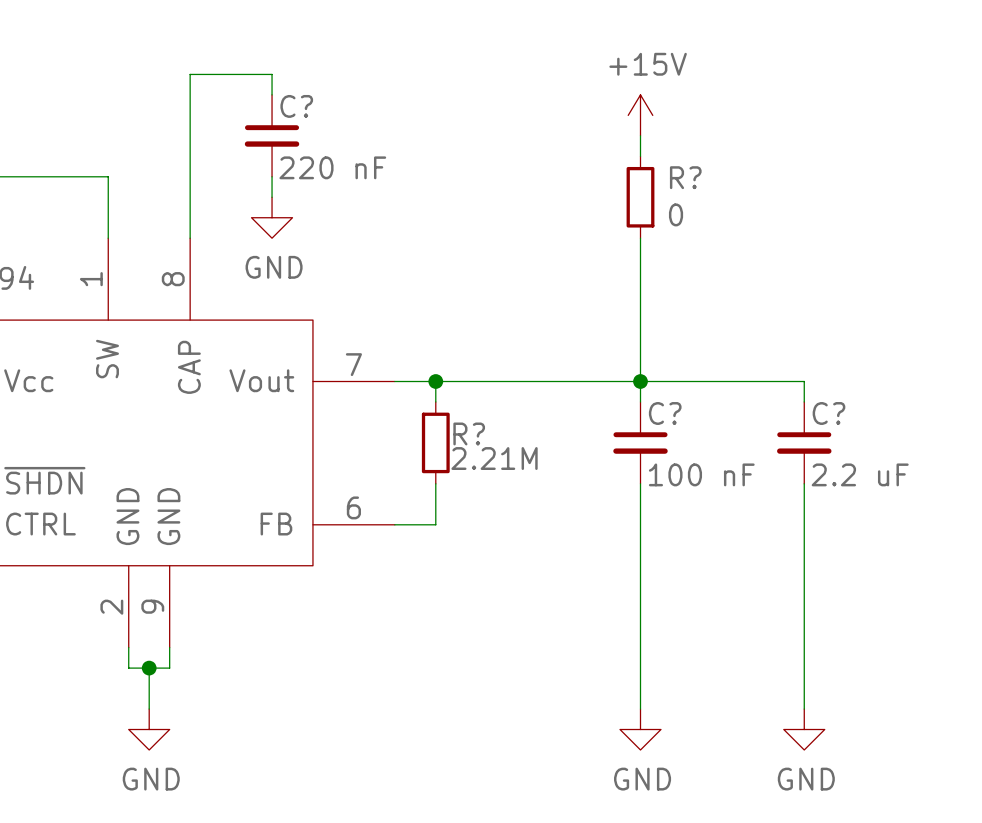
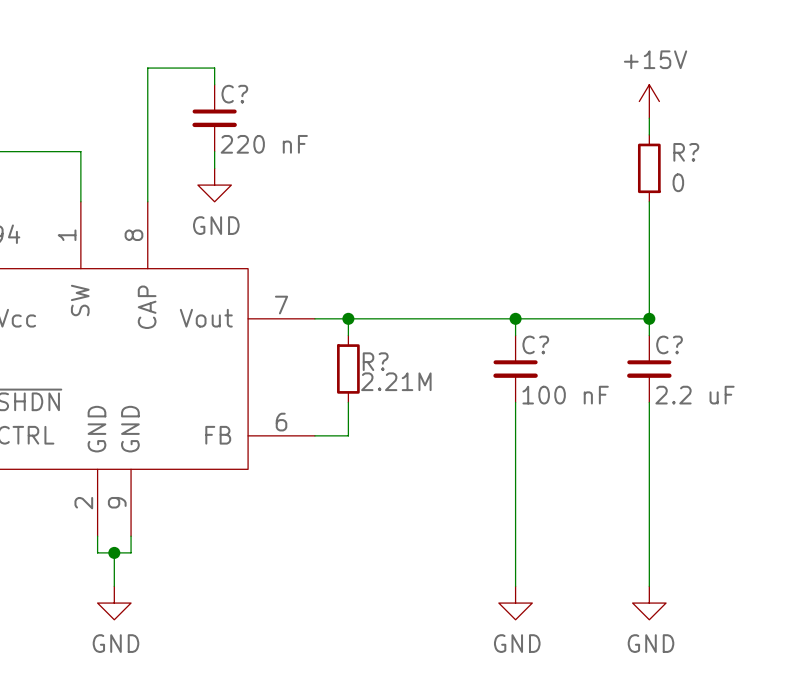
power symbol position: +15V (640, 115) -> +15V (649, 101)
wire: (640, 135) (640, 156) -> (649, 118) (649, 134)
R? position: (640, 197) -> (649, 168)
wire: (640, 238) (640, 381) -> (649, 201) (649, 318)
junction: none -> (649, 318)

